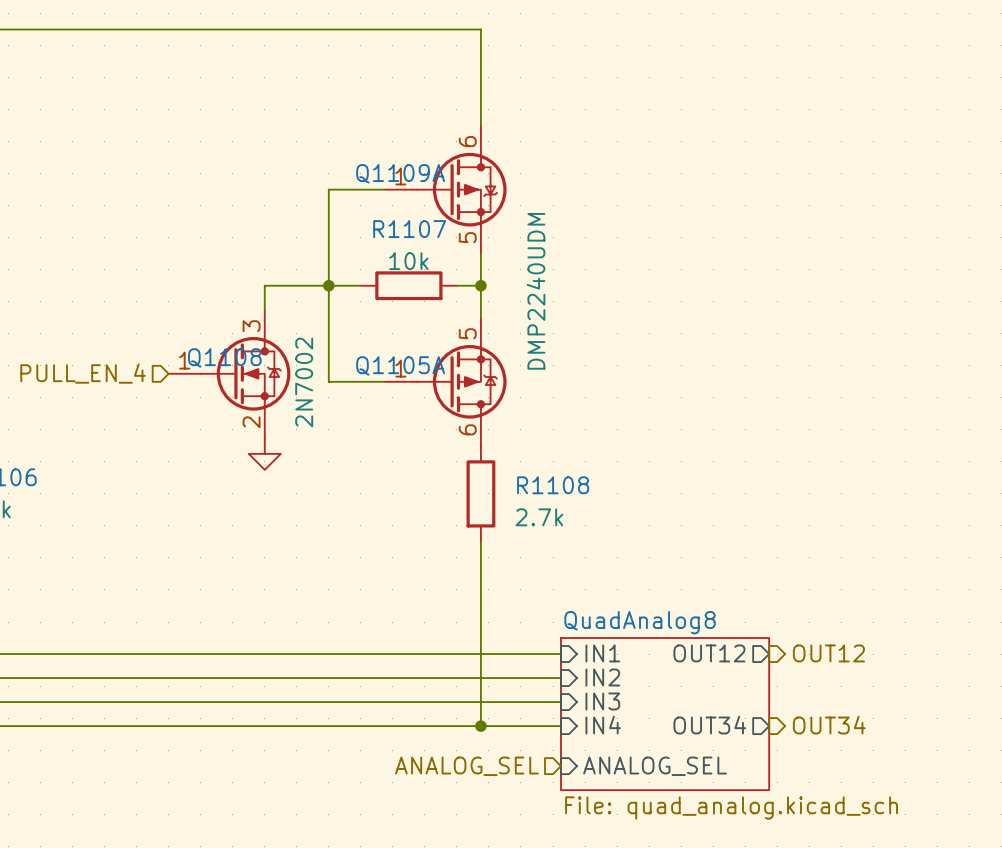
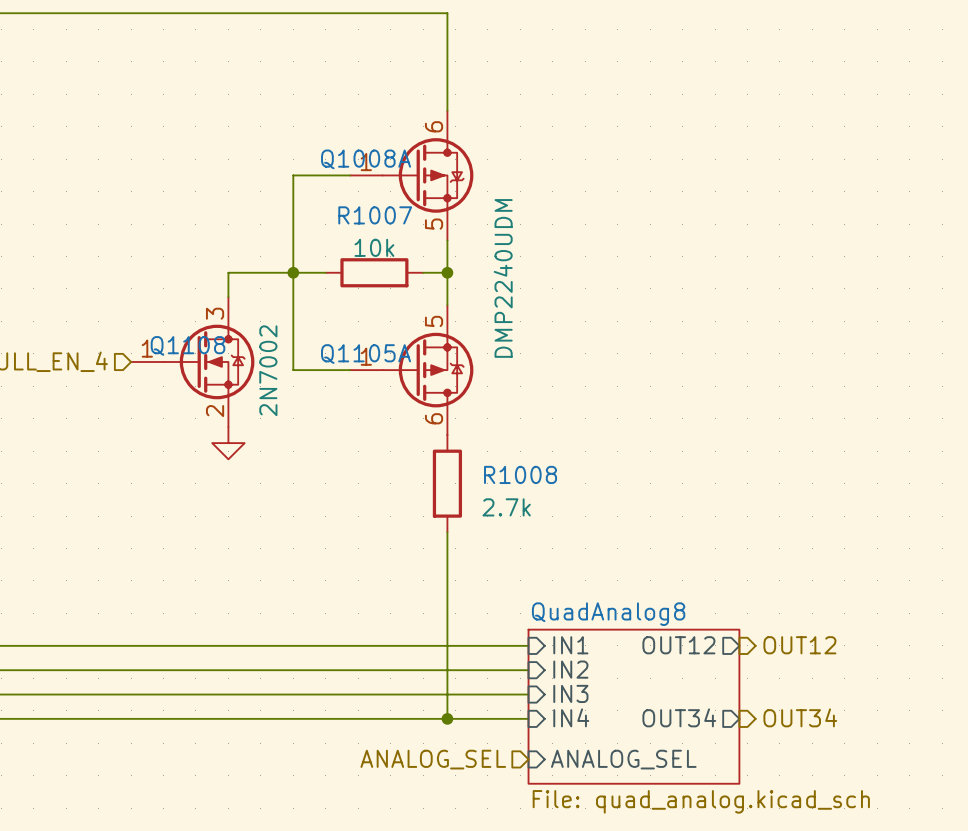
Q1109A name: Q1109A (400, 173) -> Q1008A (366, 159)
R1107 name: R1107 (409, 229) -> R1007 (375, 215)
R1108 name: R1108 (553, 485) -> R1008 (520, 474)

